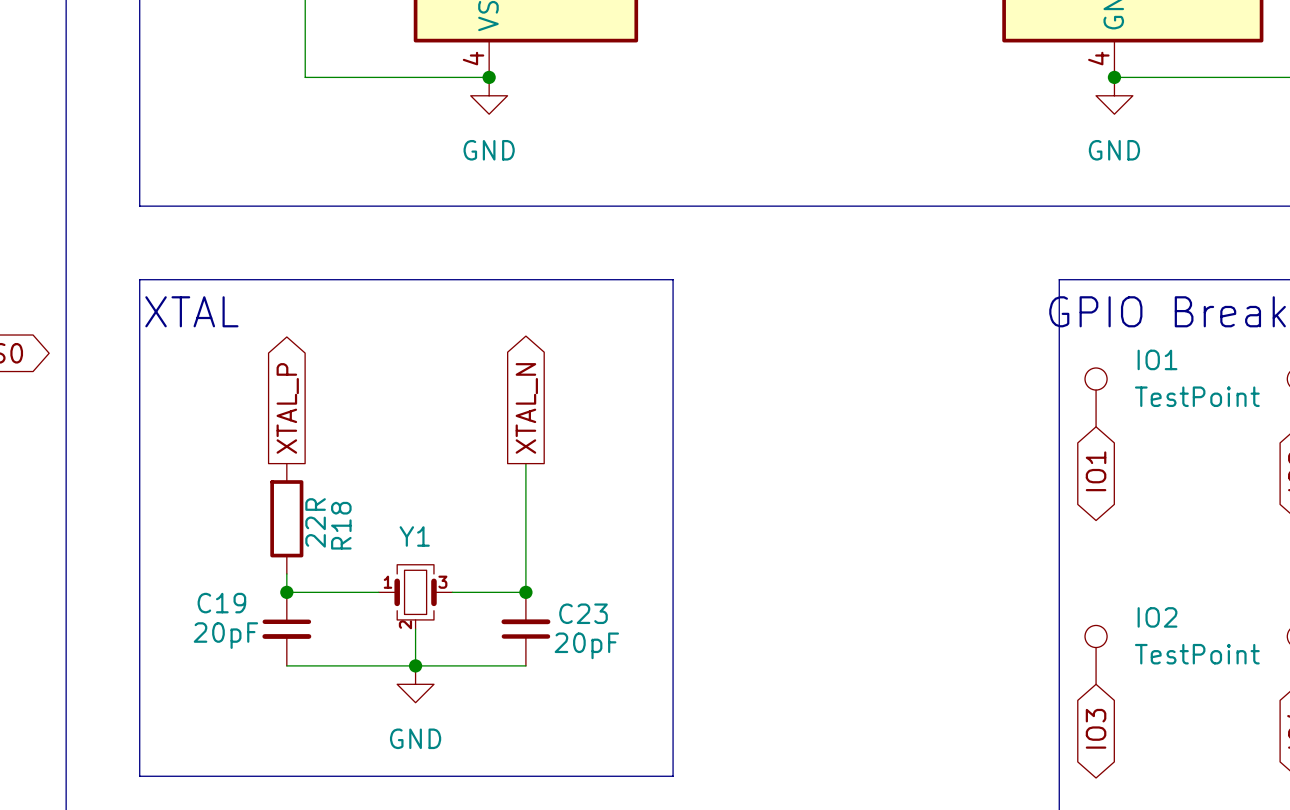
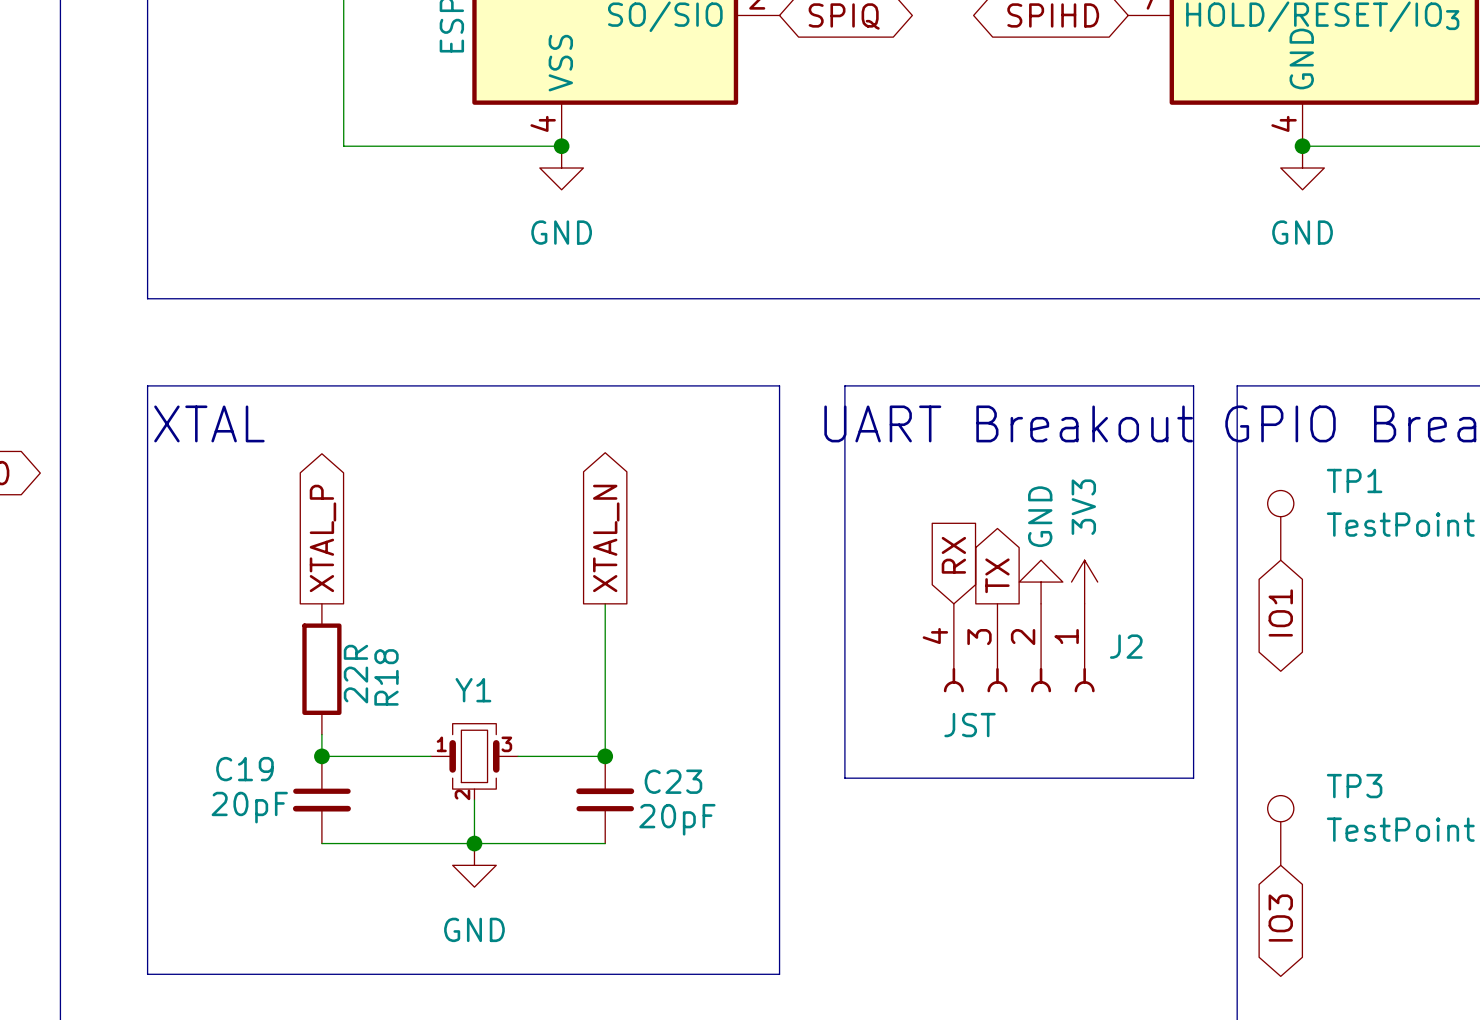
line: none -> (844, 385) (1193, 385) (1193, 778) (844, 778) (844, 385)
text: none -> UART Breakout (1008, 423)
IO1 name: IO1 (1157, 359) -> TP1 (1354, 480)
global label: none -> RX (953, 555)
global label: none -> TX (997, 575)
power symbol: none -> GND (1041, 582)
power symbol: none -> 3V3 (1084, 582)
J2: none -> JST (1019, 648)
IO2 name: IO2 (1157, 617) -> TP3 (1354, 786)

